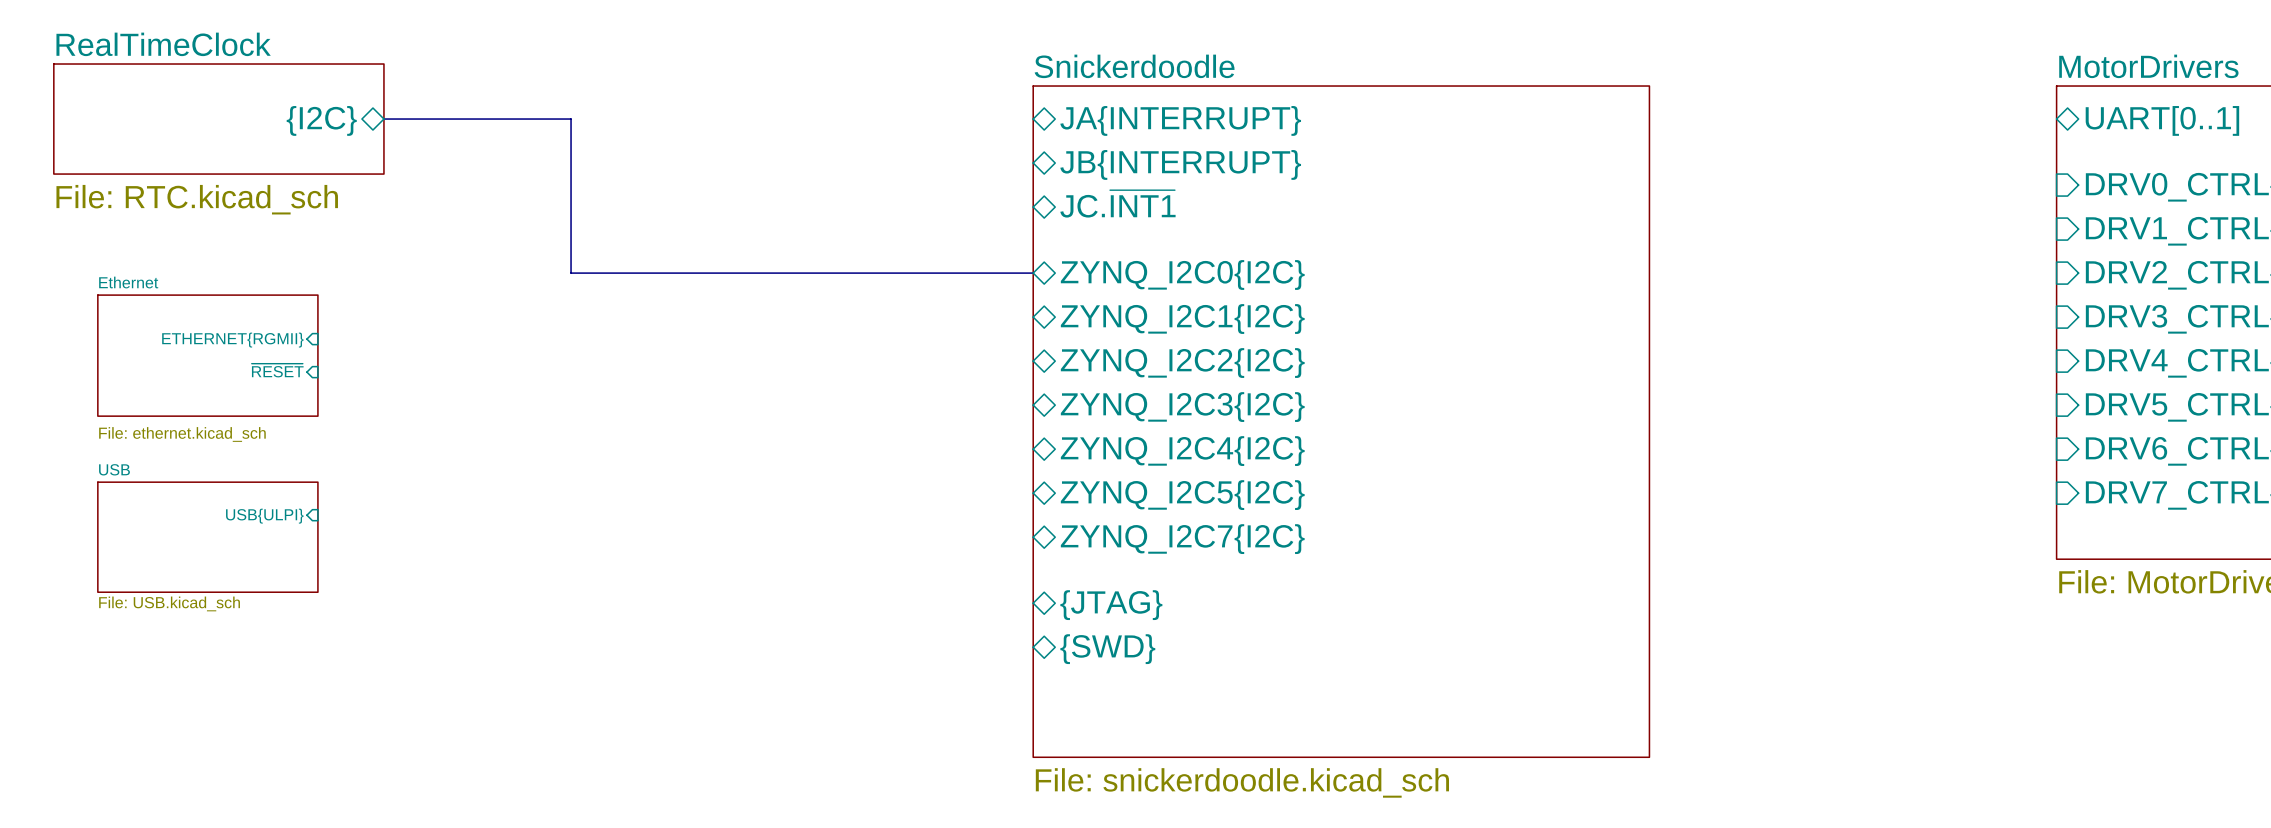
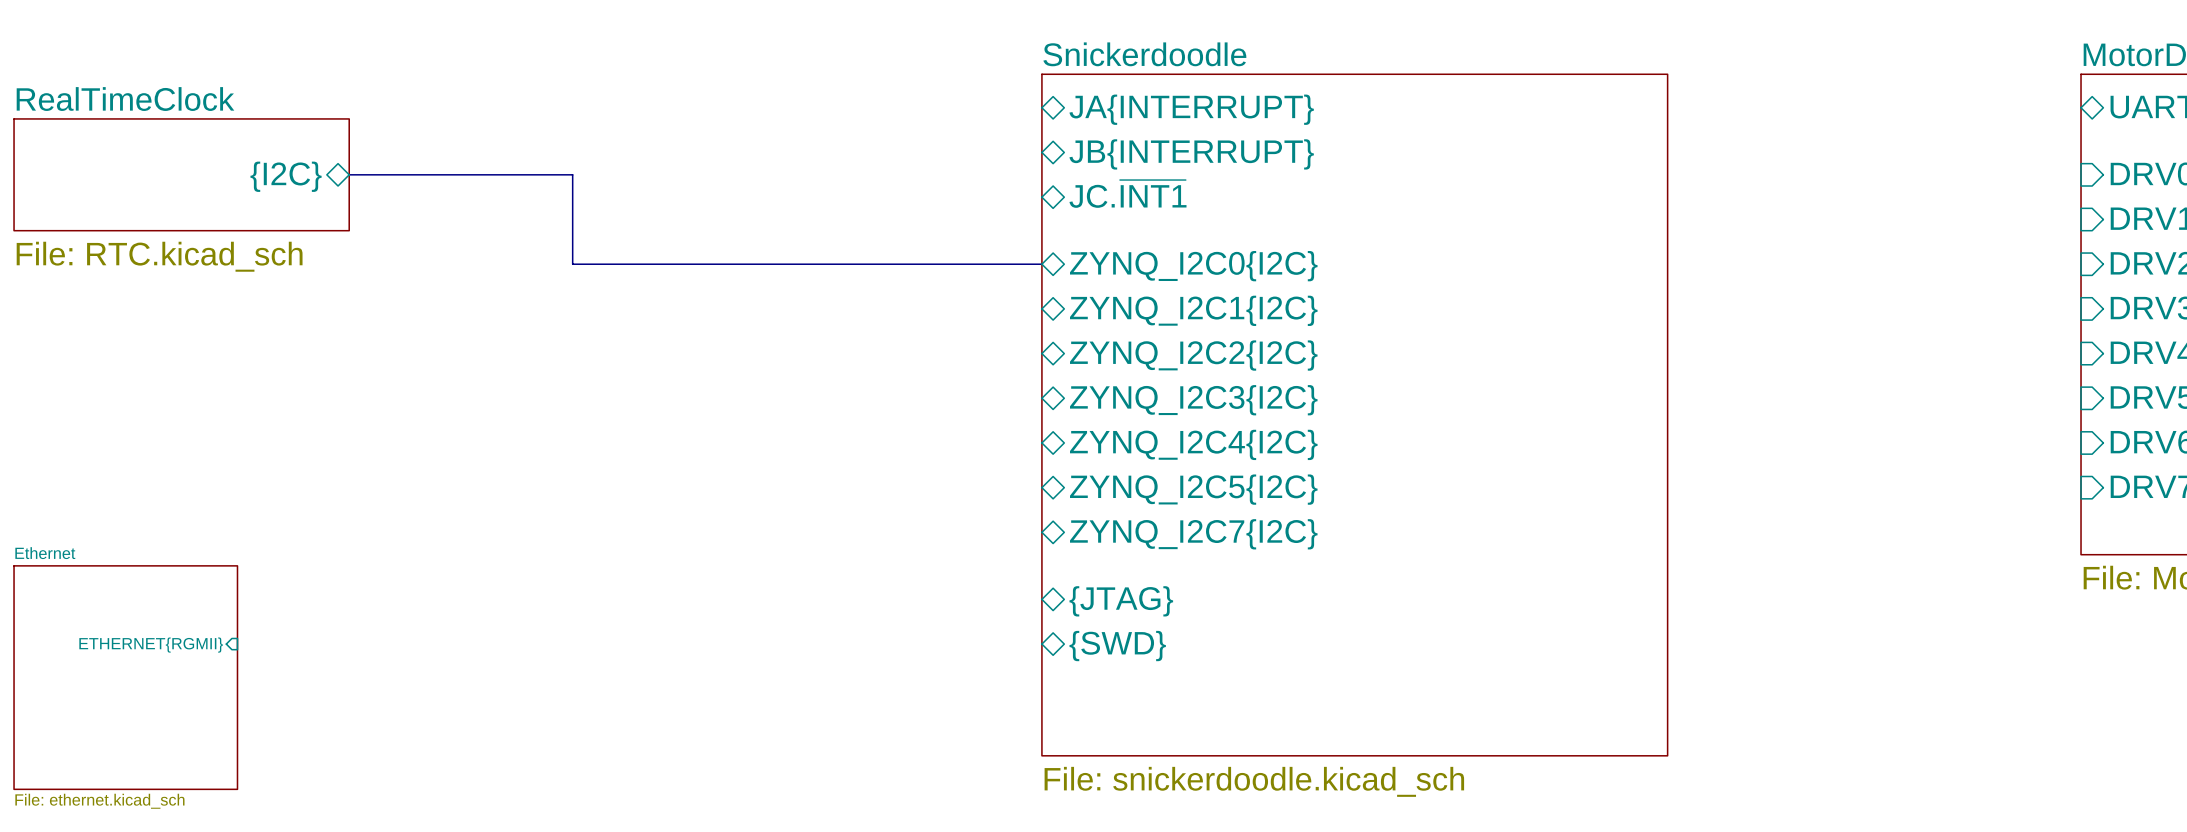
sheet RealTimeClock position: (218, 119) -> (181, 174)
bus: (383, 119) (571, 119) (571, 185) -> (349, 174) (572, 174)
sheet pin position: {I2C} (321, 120) -> {I2C} (286, 176)
sheet pin: ETHERNET{RGMII} (232, 340) -> none
sheet Ethernet: File: ethernet.kicad_sch (207, 355) -> none
sheet pin: ~{RESET} (277, 370) -> none
sheet pin: USB{ULPI} (264, 516) -> none
sheet USB: File: USB.kicad_sch (207, 537) -> none
sheet pin: none -> ETHERNET{RGMII} (151, 645)
sheet Ethernet: none -> File: ethernet.kicad_sch (125, 677)

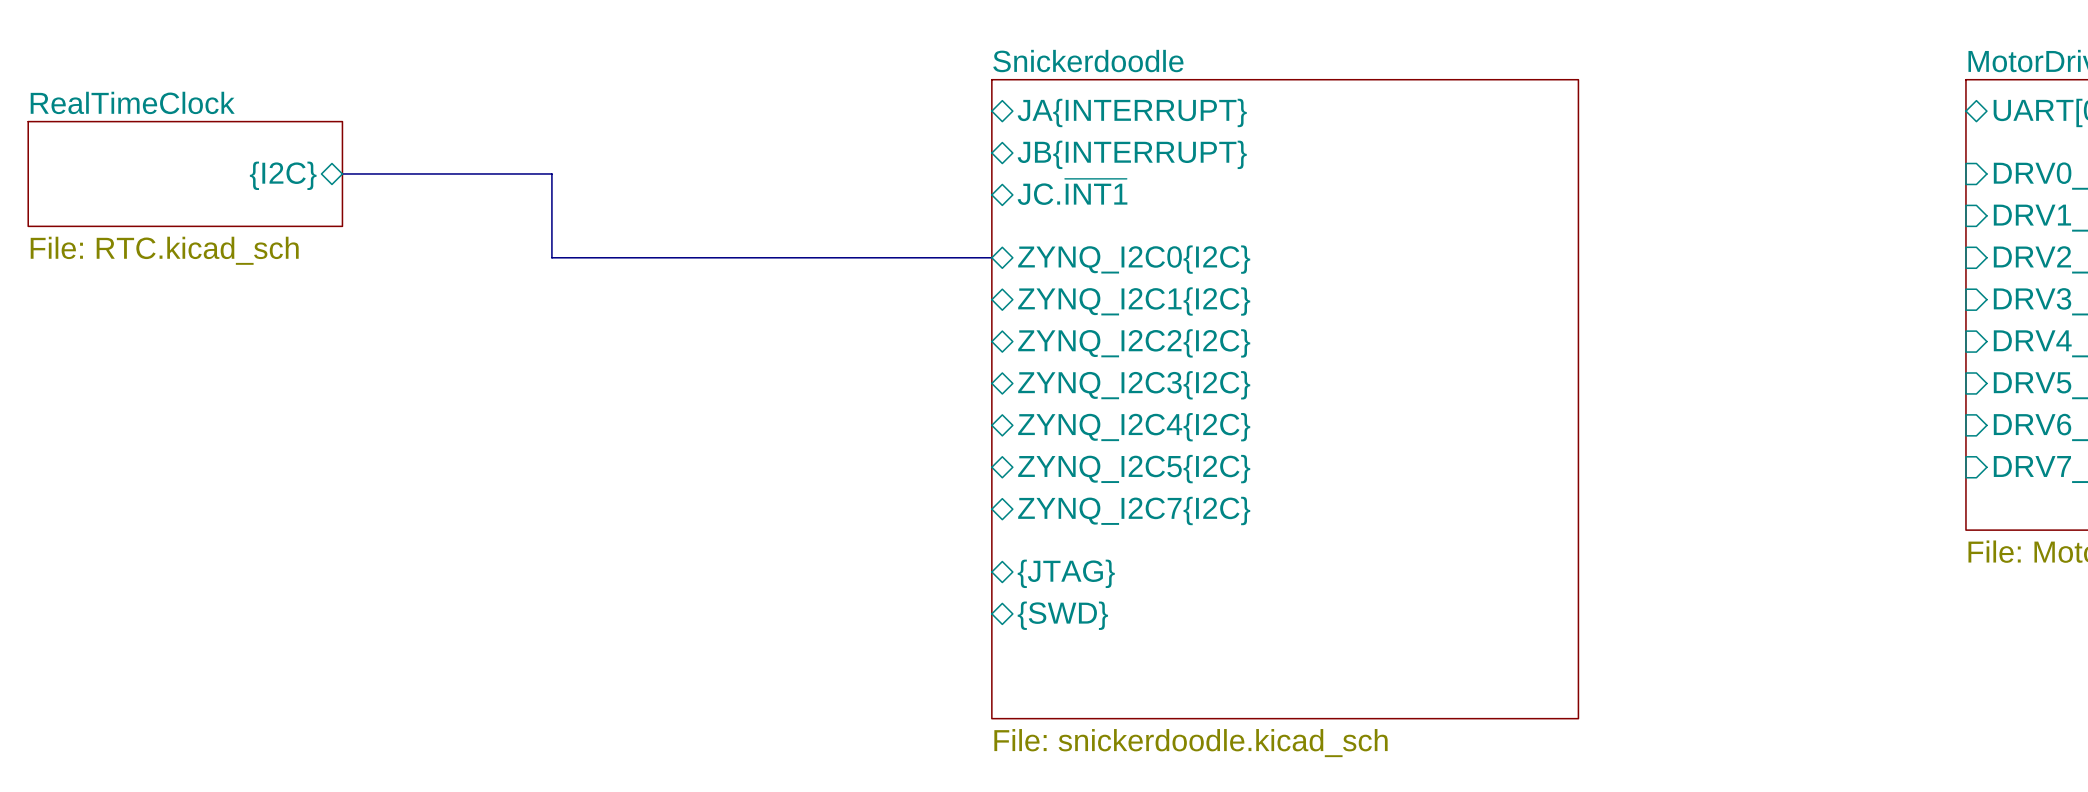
sheet pin: ETHERNET{RGMII} (151, 645) -> none
sheet Ethernet: File: ethernet.kicad_sch (125, 677) -> none

